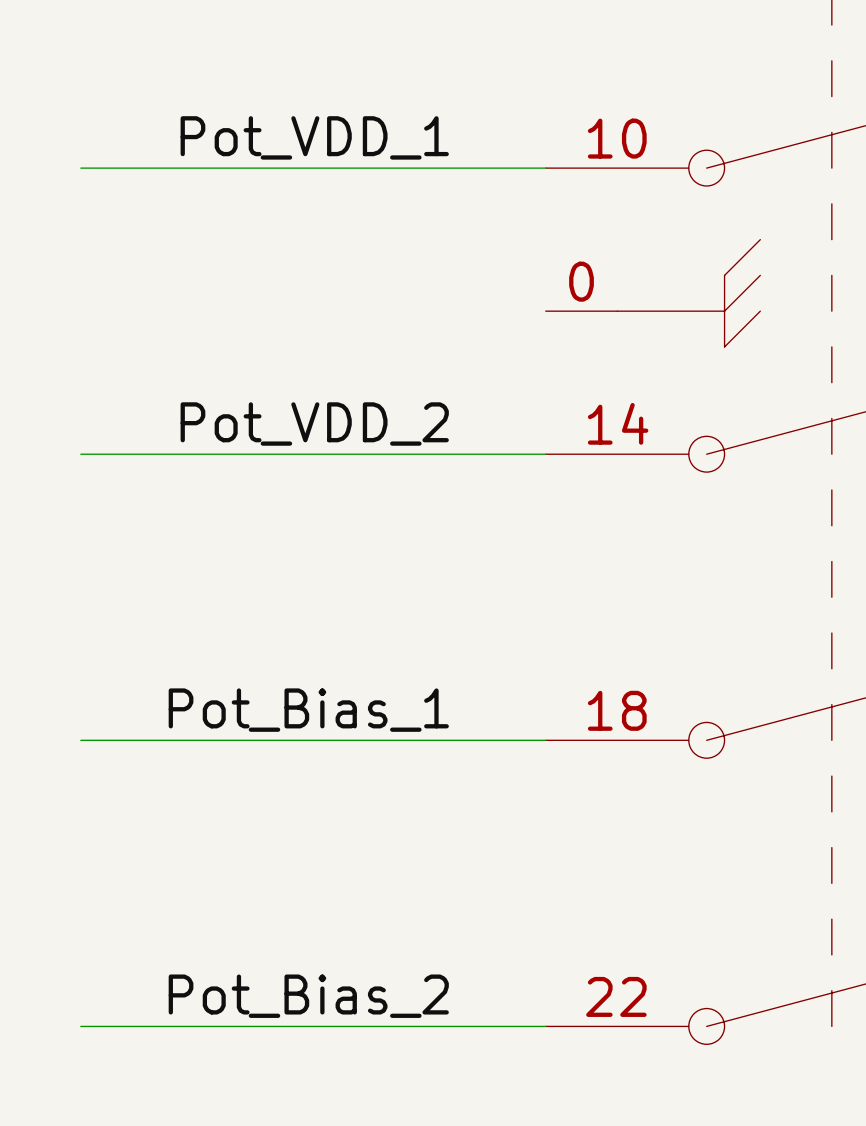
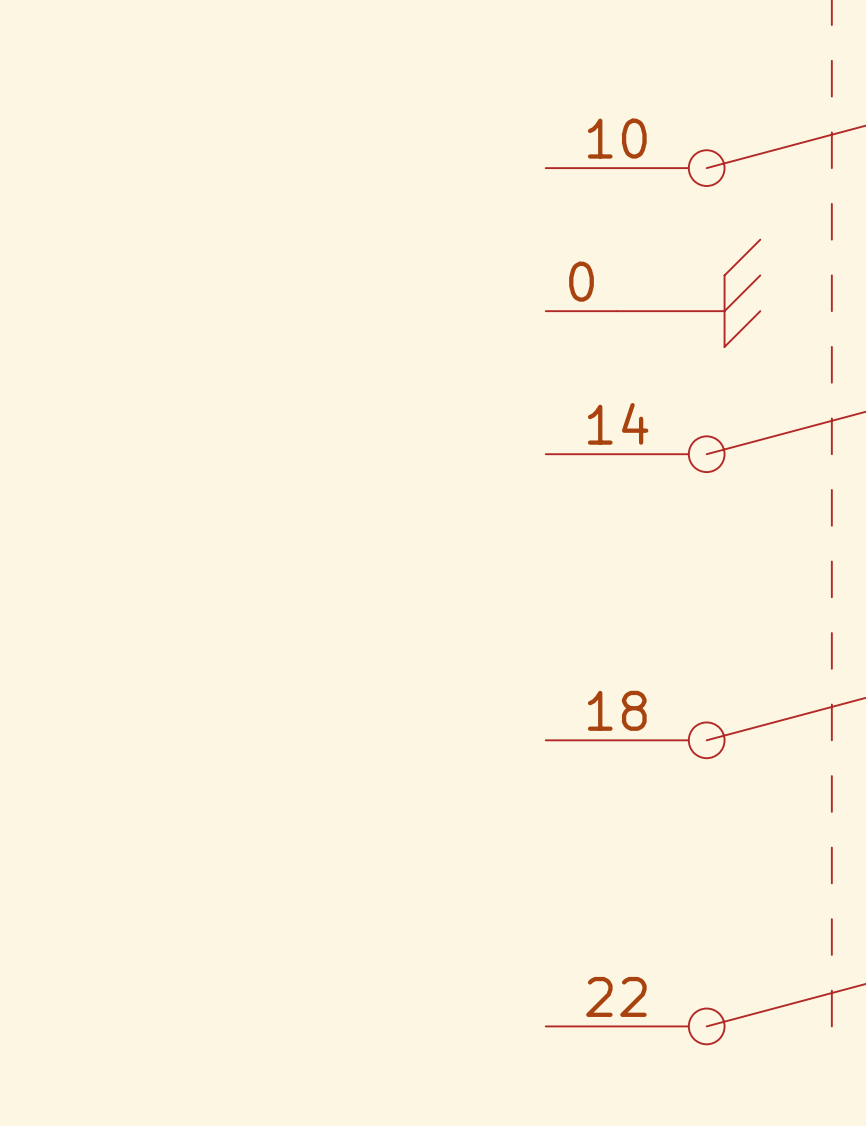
label: Pot_VDD_1 (314, 137) -> none
wire: (80, 168) (545, 168) -> none
label: Pot_VDD_2 (314, 424) -> none
wire: (80, 454) (545, 454) -> none
label: Pot_Bias_1 (308, 710) -> none
wire: (80, 740) (545, 740) -> none
label: Pot_Bias_2 (308, 996) -> none
wire: (80, 1026) (545, 1026) -> none

